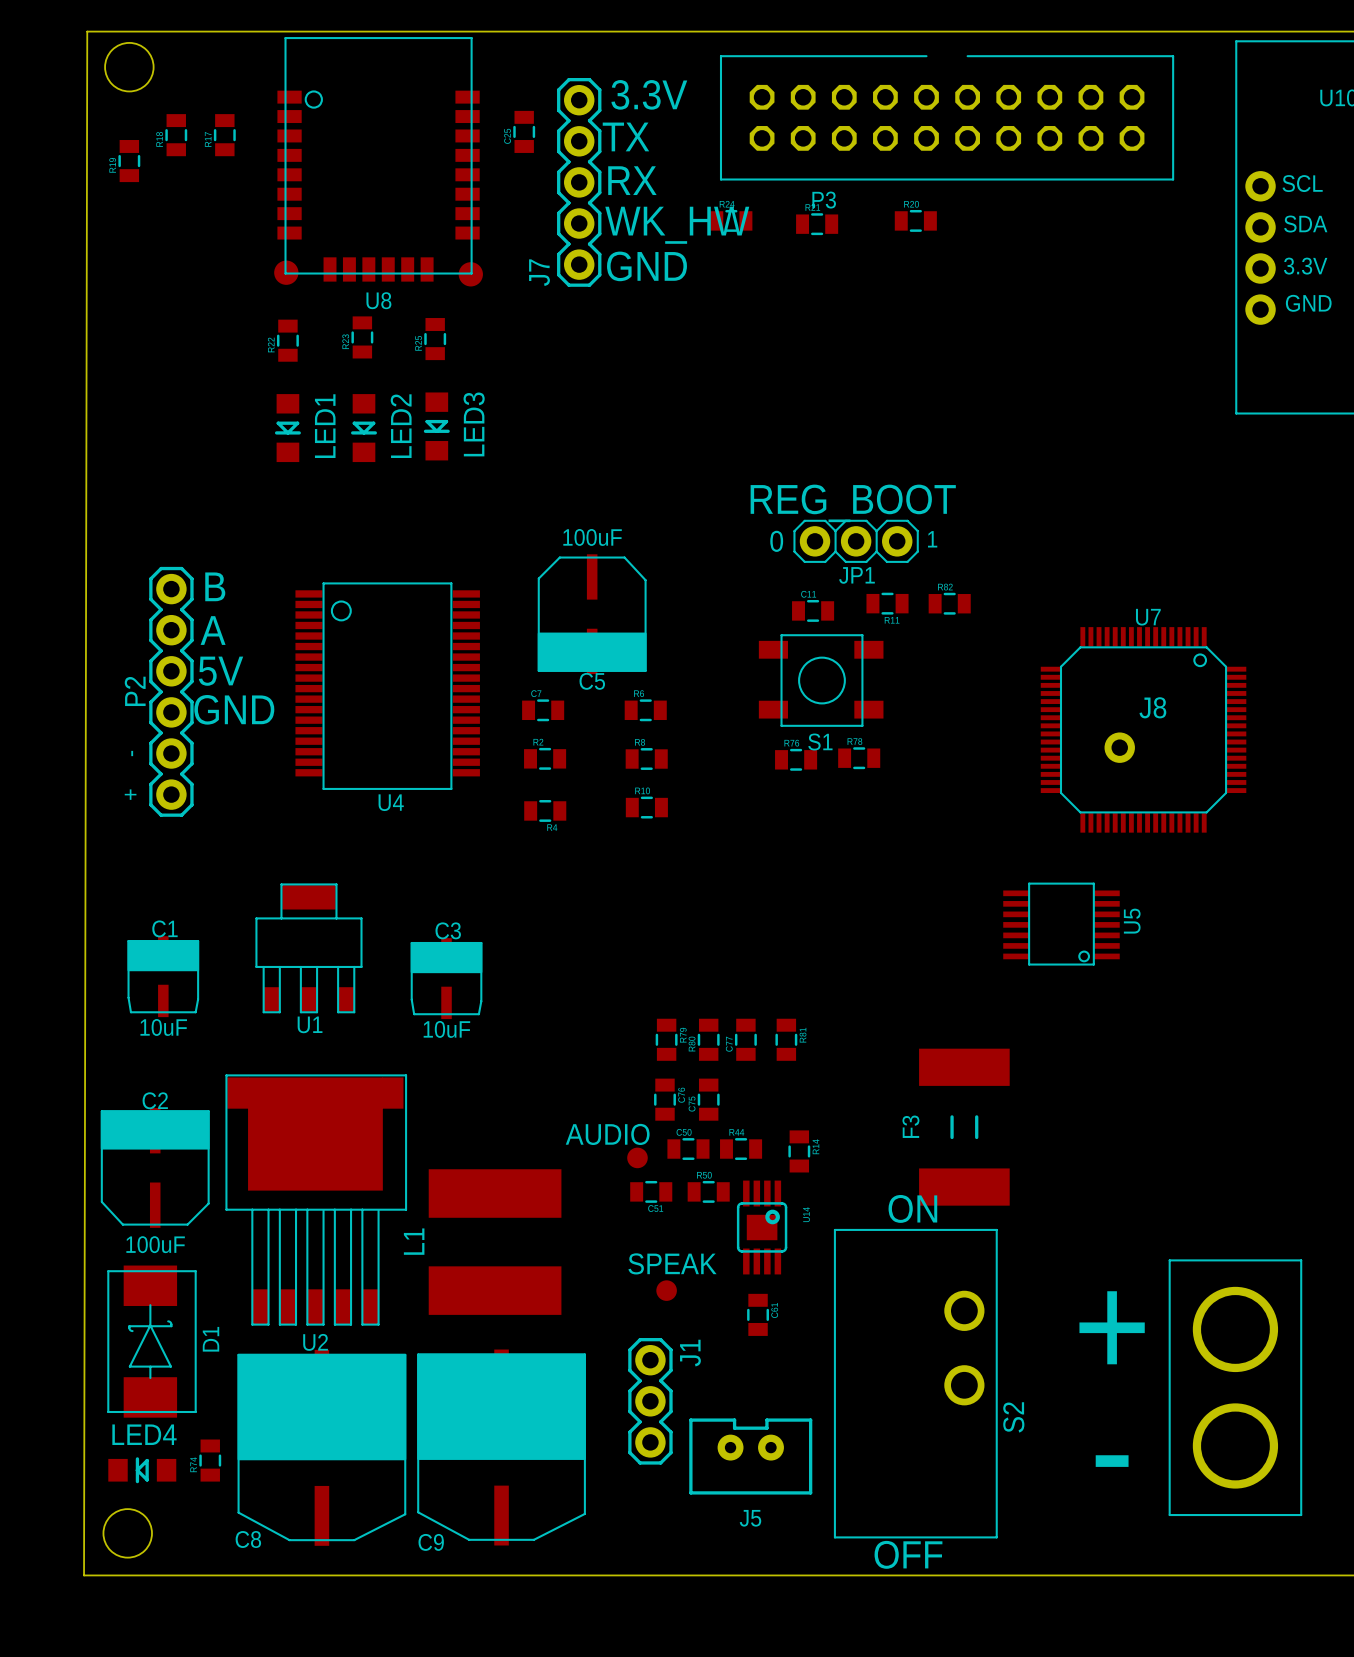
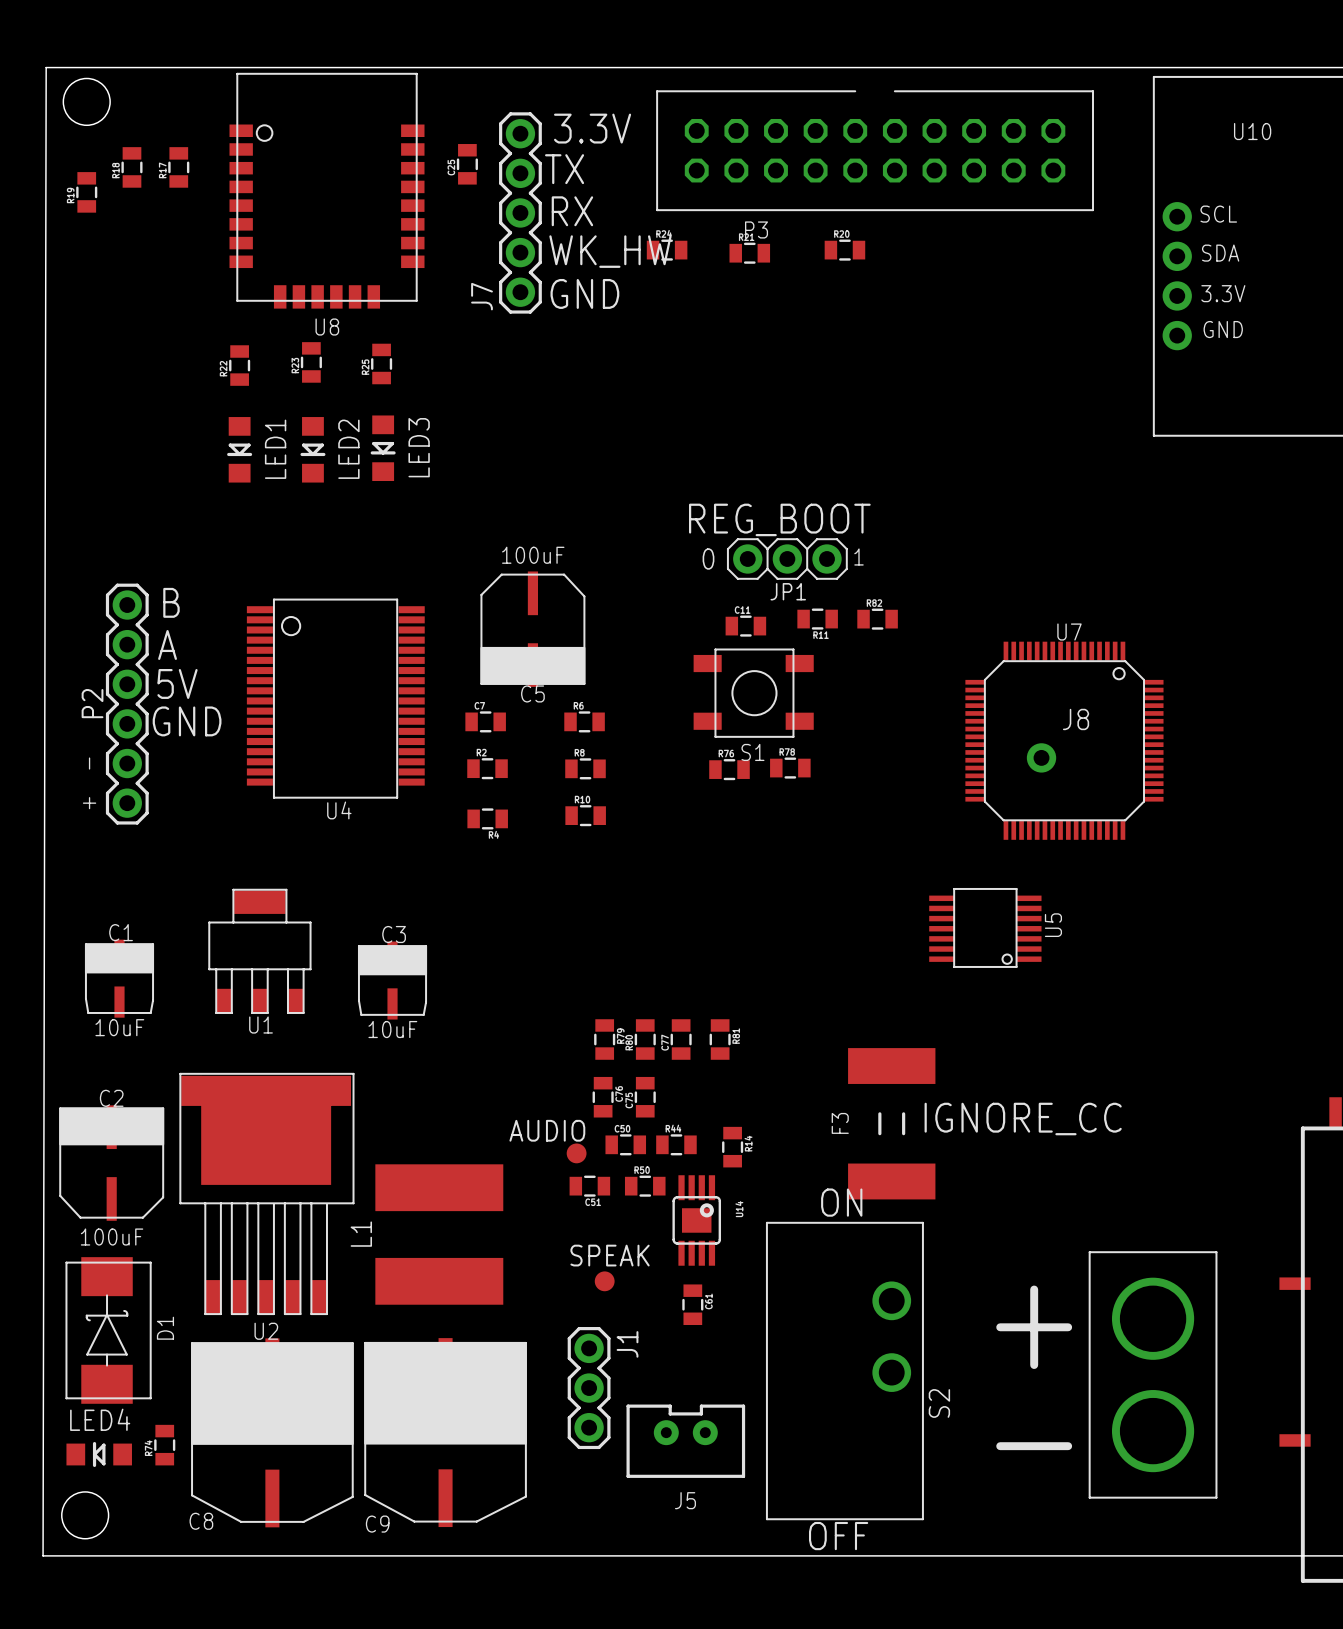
U8 footprint: [274, 37, 483, 287] -> [229, 72, 425, 309]
text: none -> IGNORE_CC (1023, 1119)

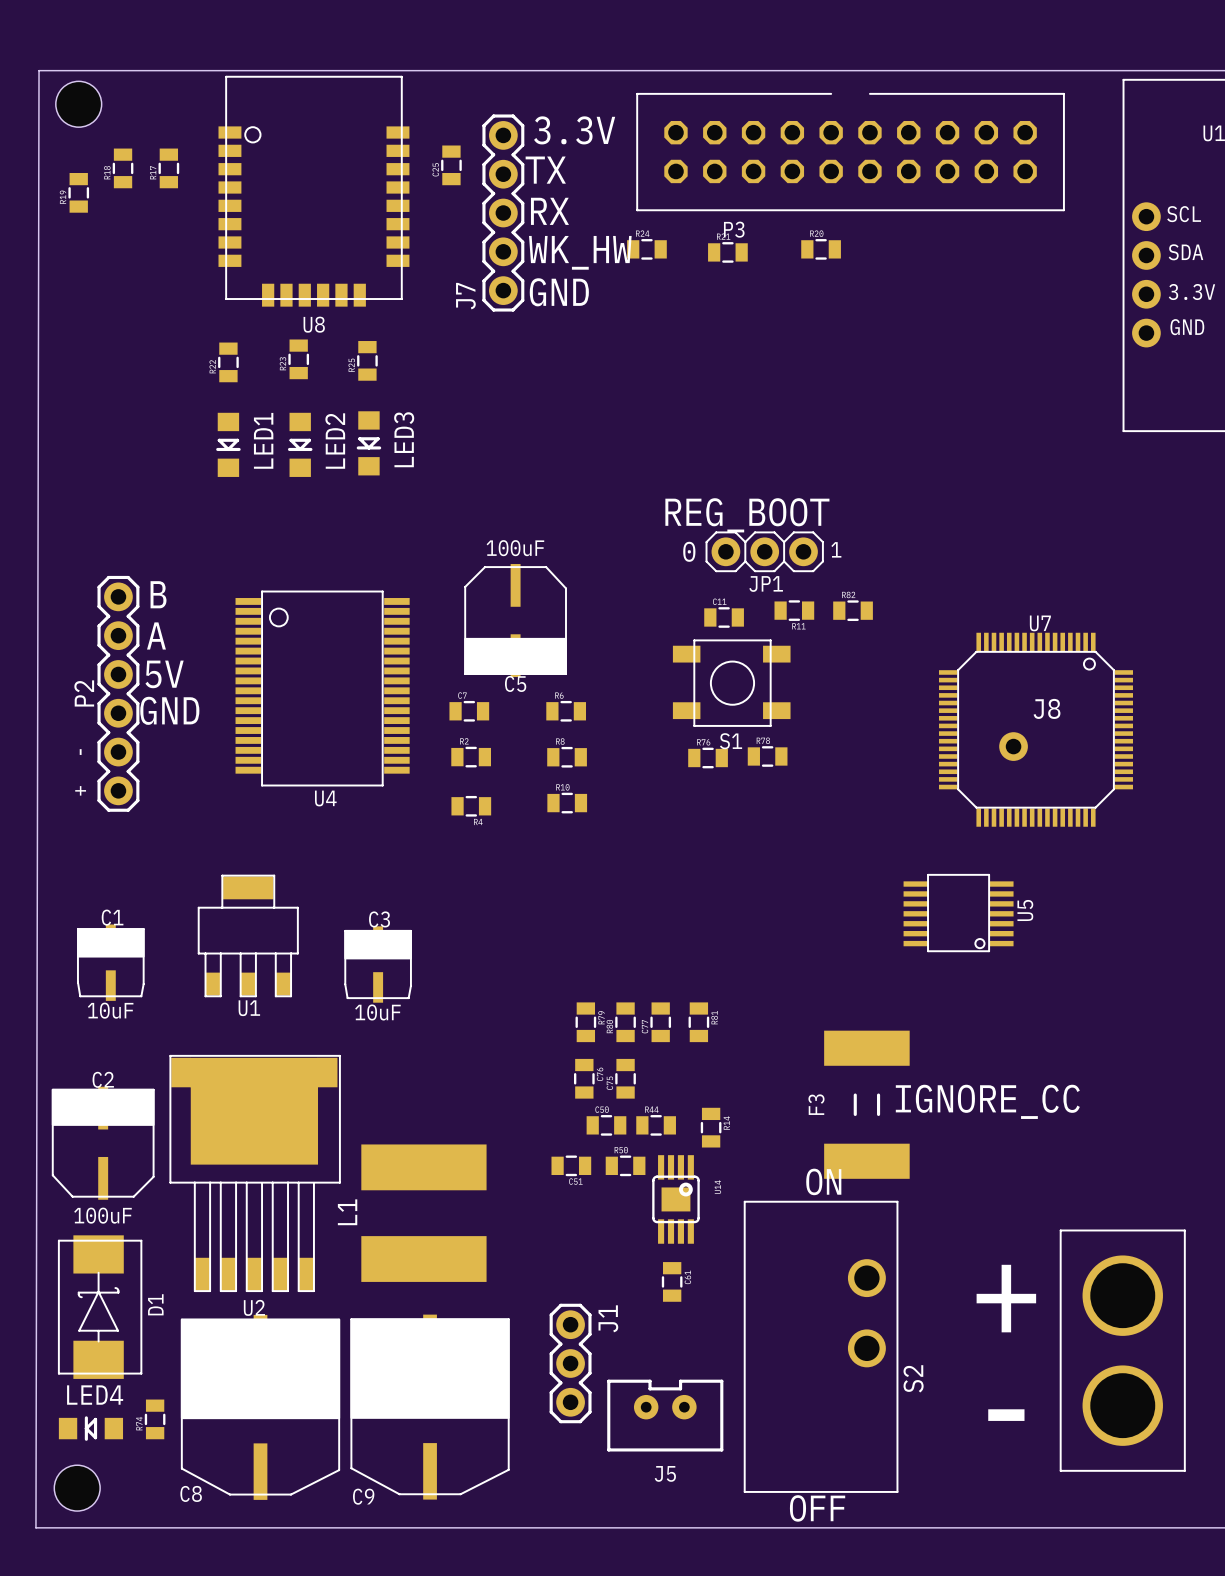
AUDIO: (576, 1153) -> none
SPEAK: (604, 1281) -> none

